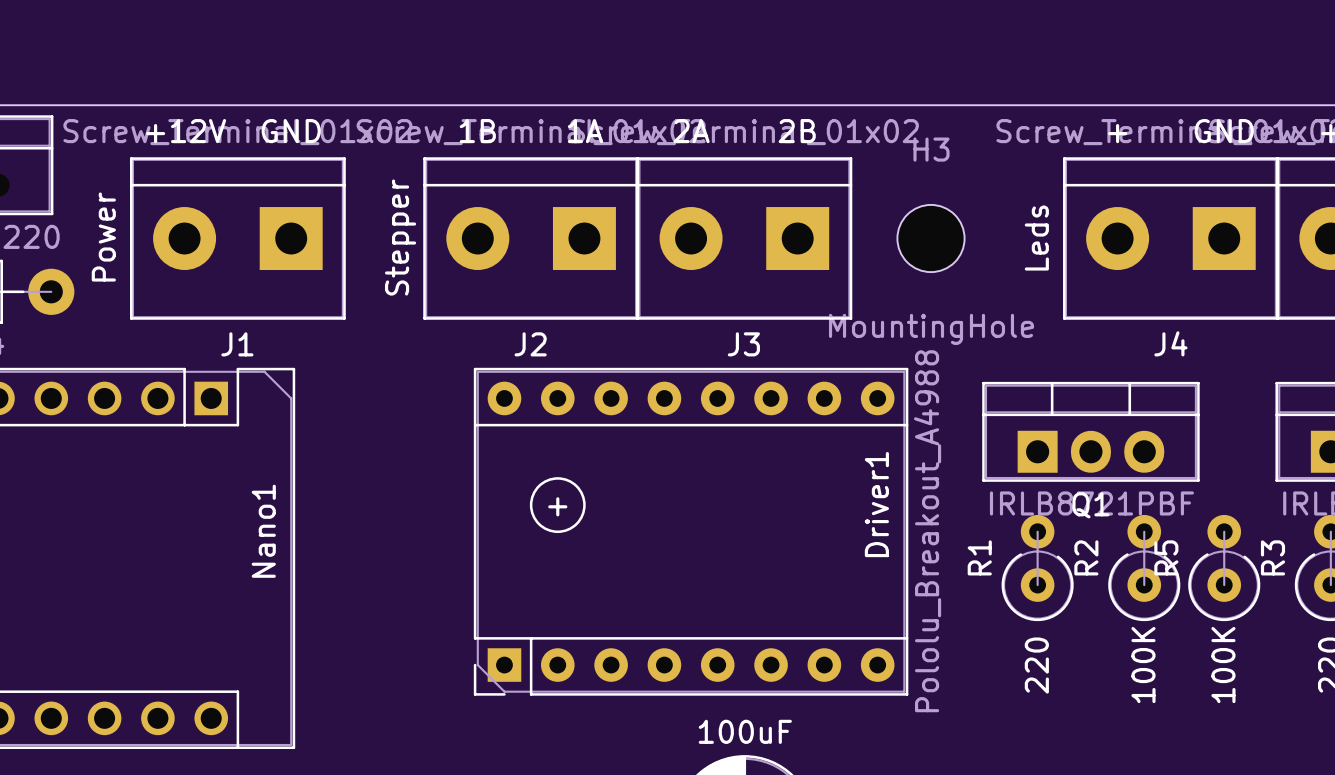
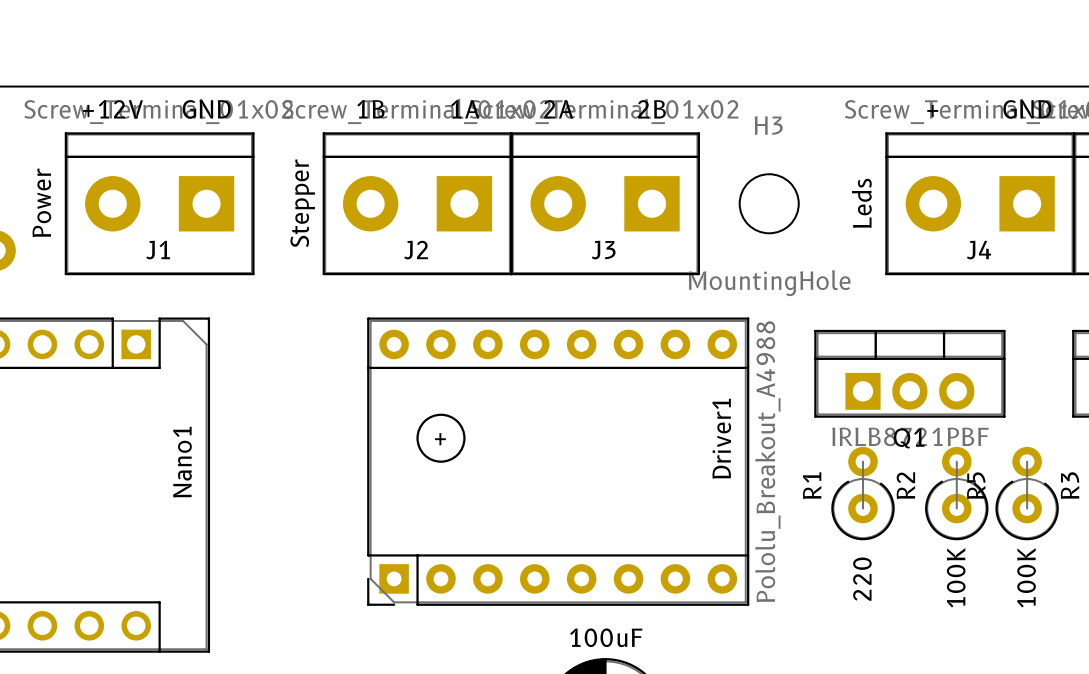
J4 name position: J4 (1170, 343) -> J4 (979, 250)
J1 name position: J1 (237, 344) -> J1 (158, 250)
J2 name position: J2 (530, 344) -> J2 (416, 250)
J3 name position: J3 (743, 344) -> J3 (603, 250)

